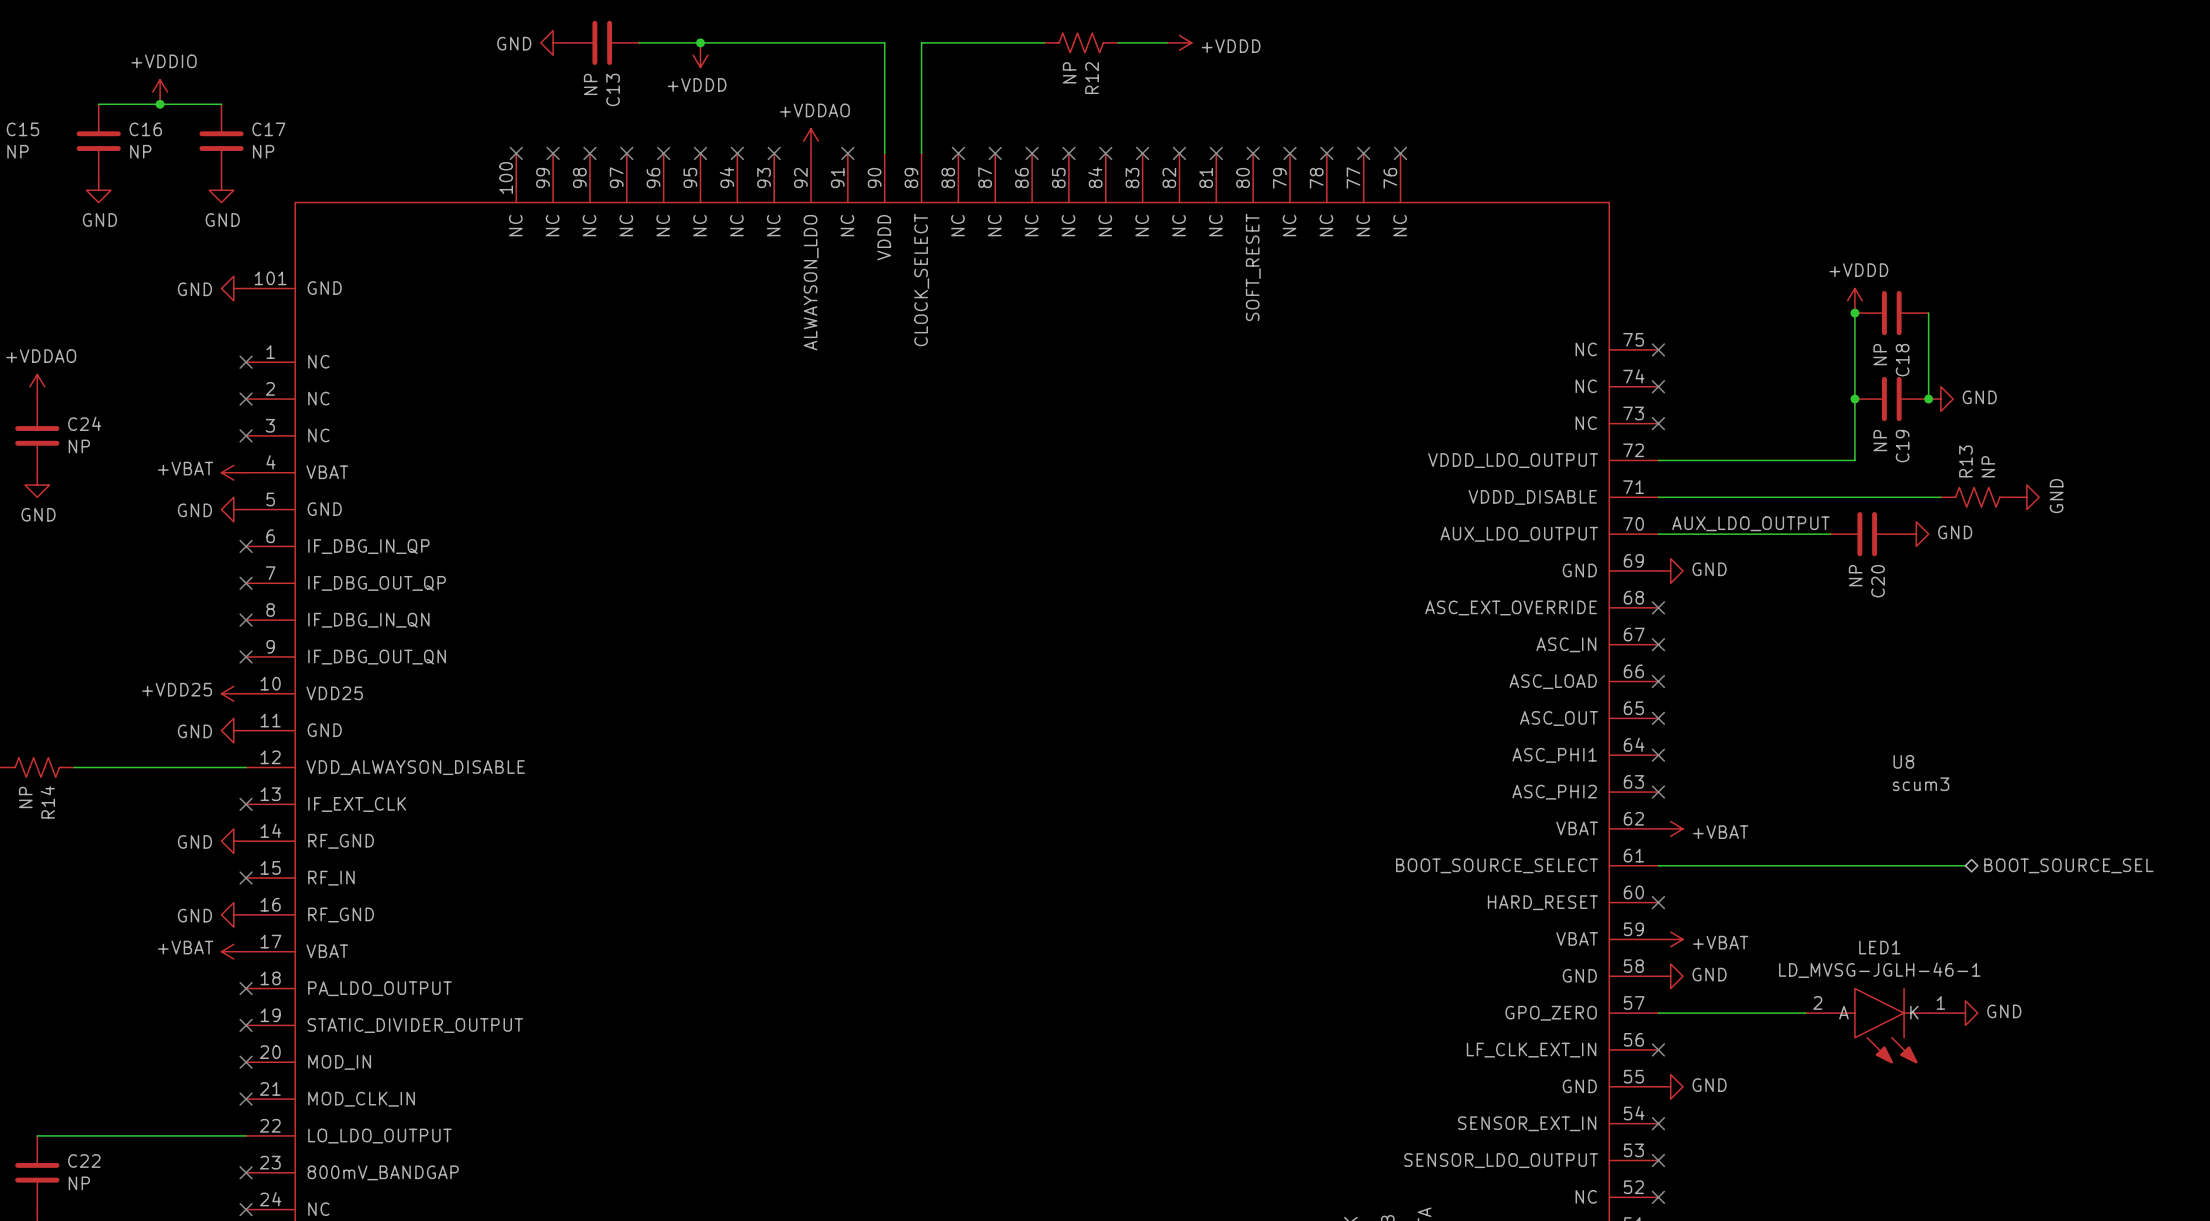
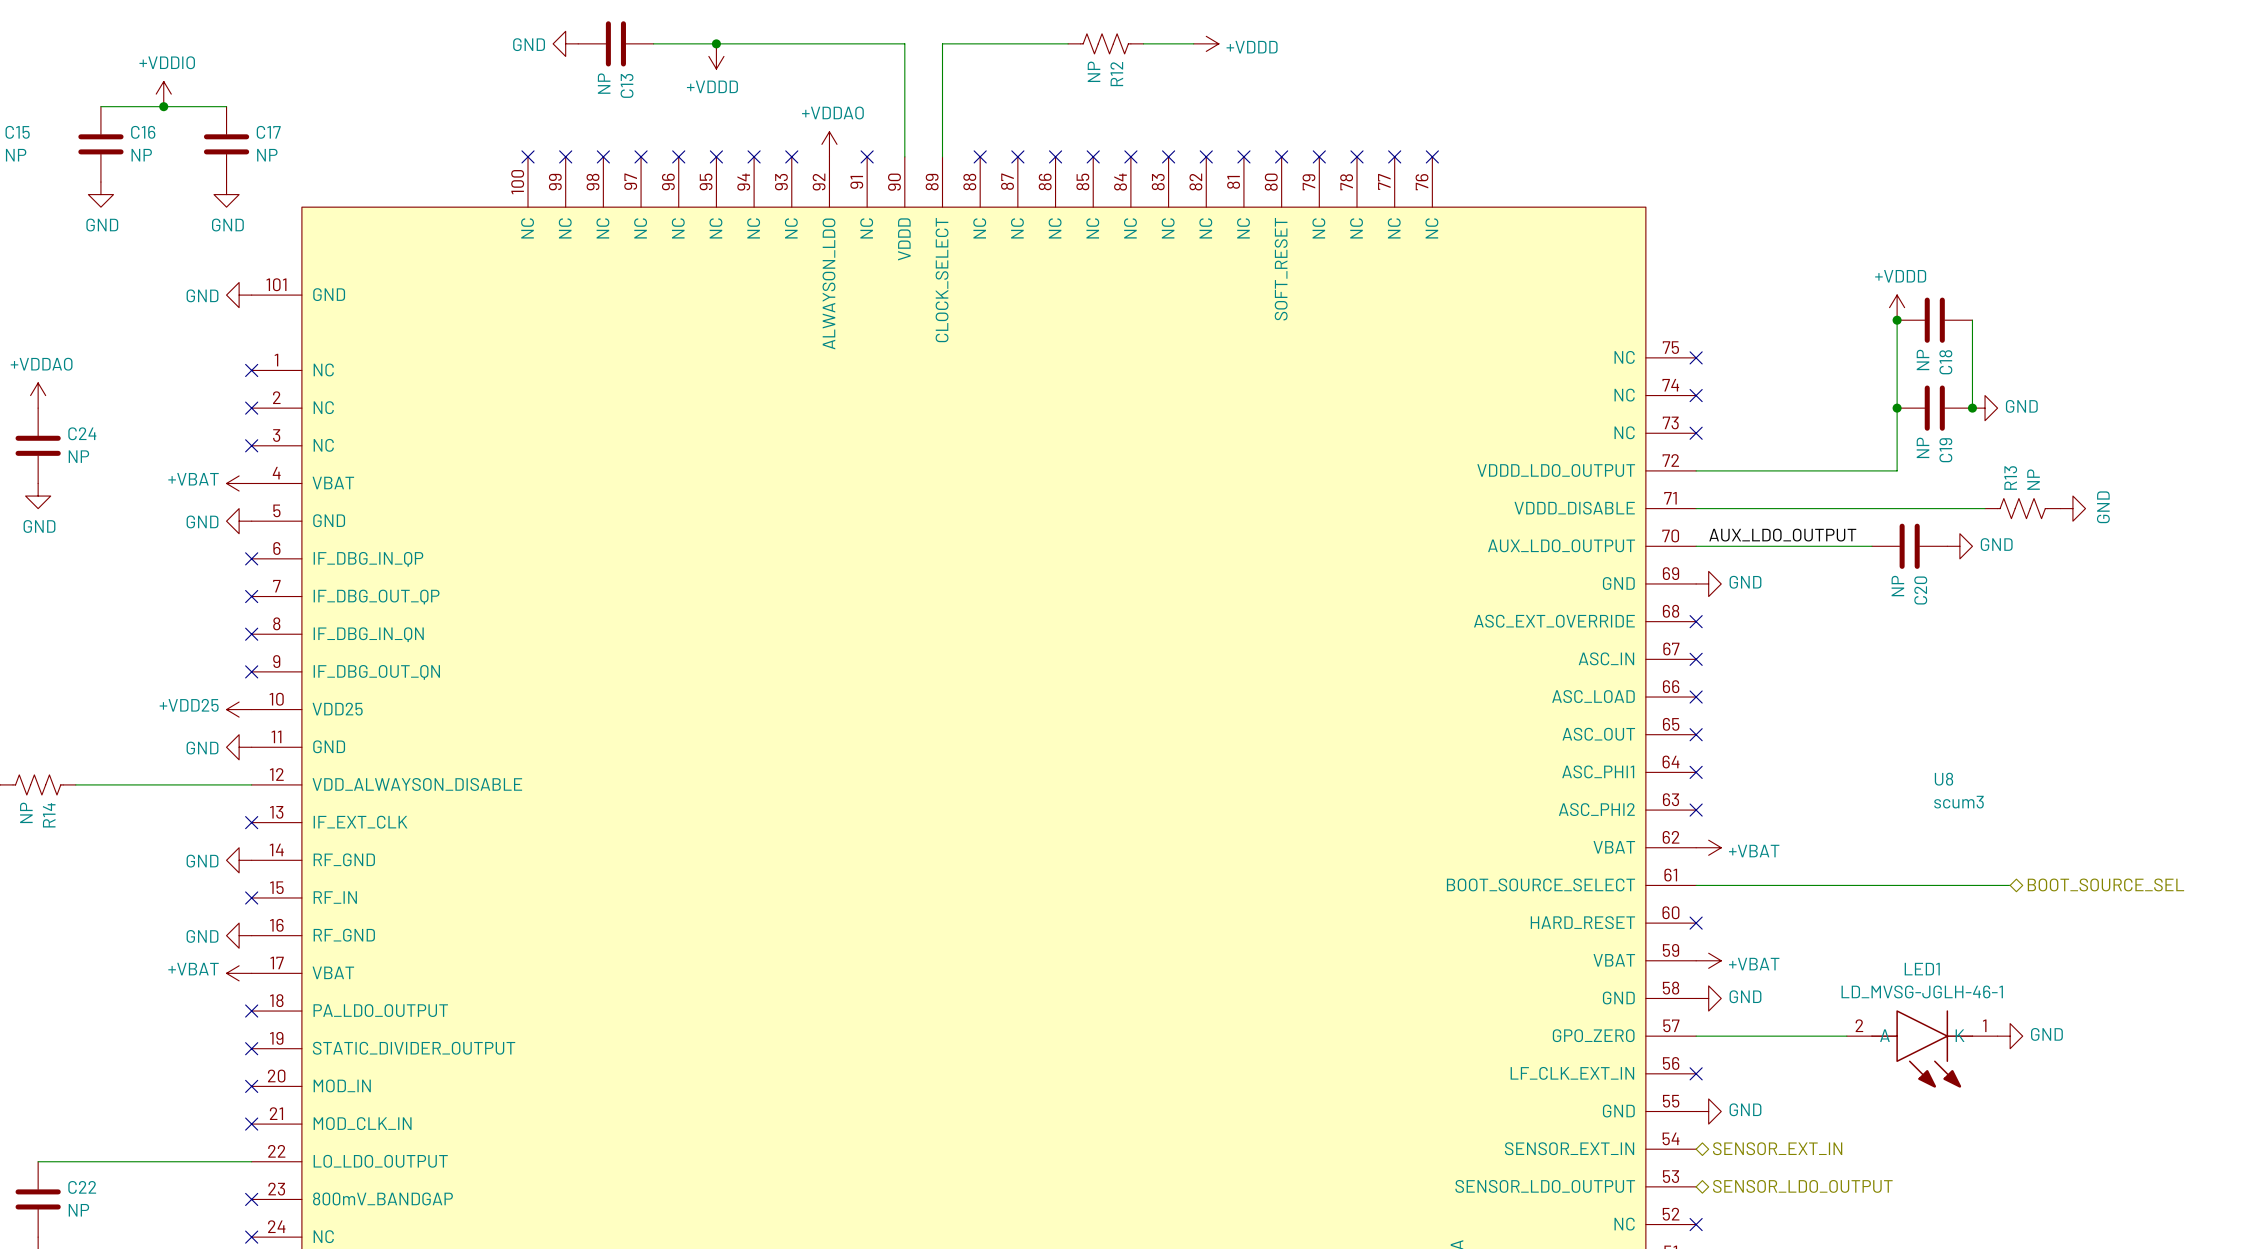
no-connect mark: (1658, 1123) -> none
hierarchical label: none -> SENSOR_EXT_IN (1777, 1148)
no-connect mark: (1658, 1160) -> none
hierarchical label: none -> SENSOR_LDO_OUTPUT (1802, 1186)

